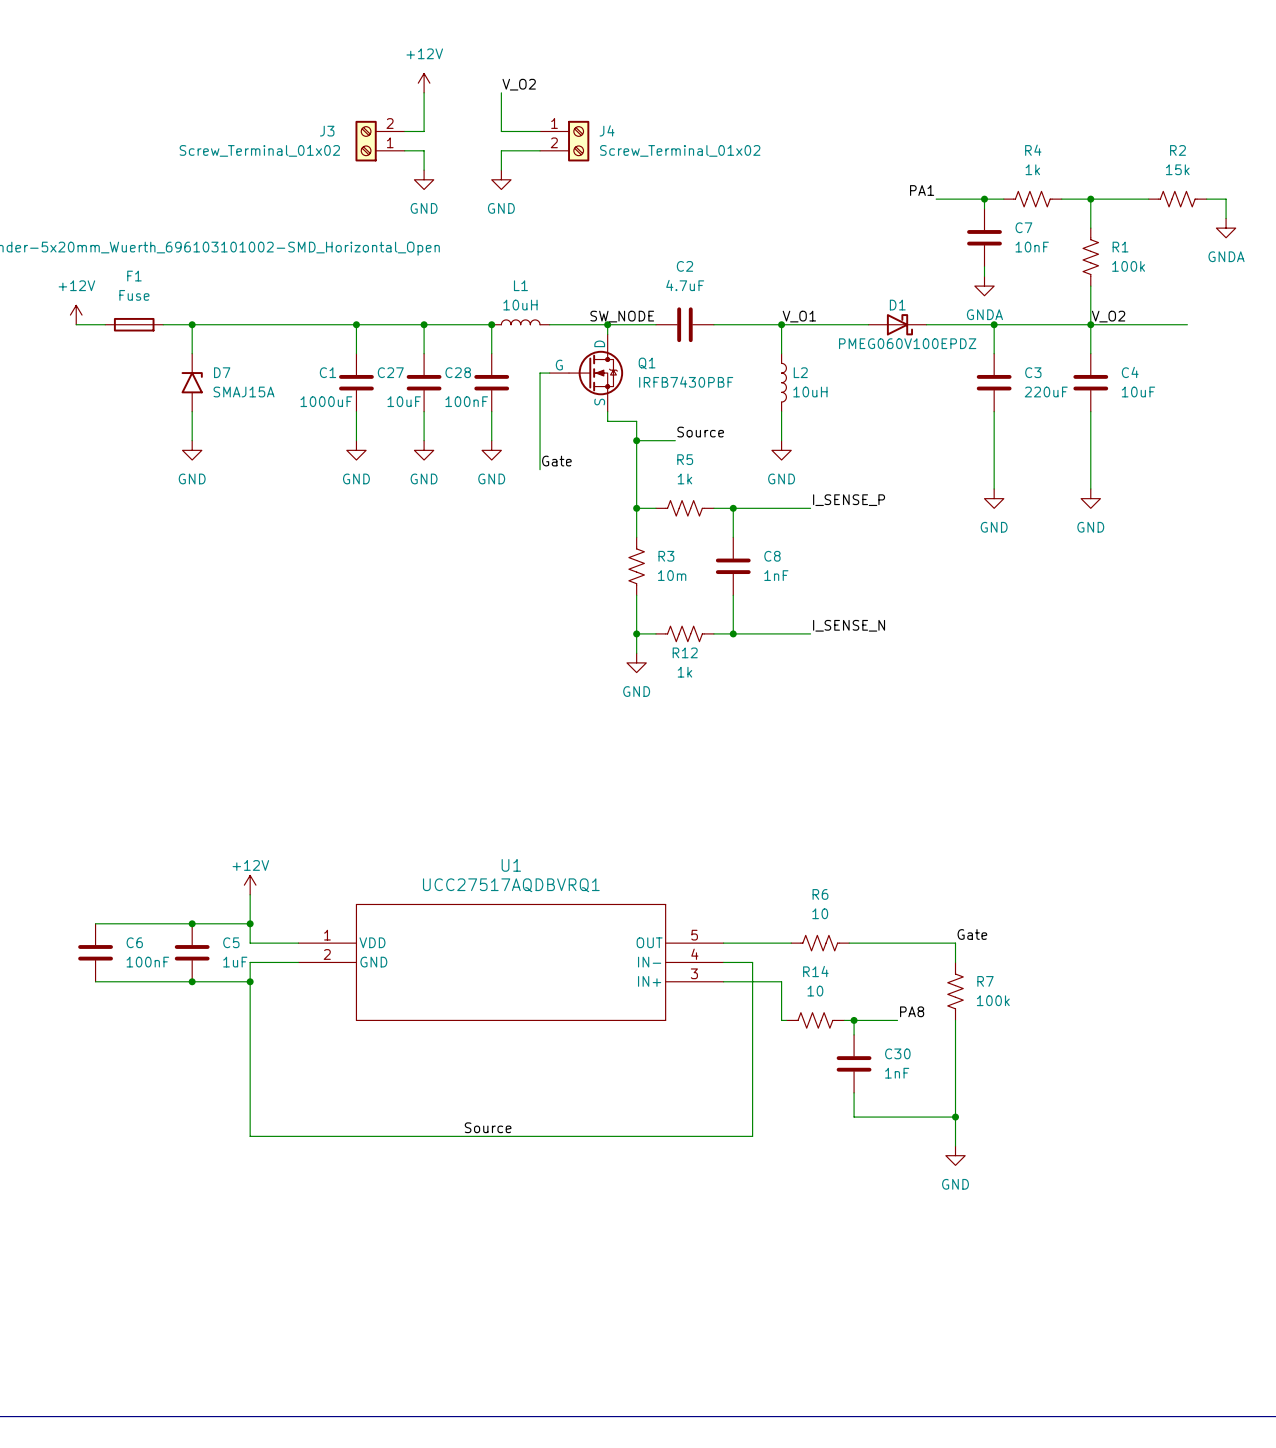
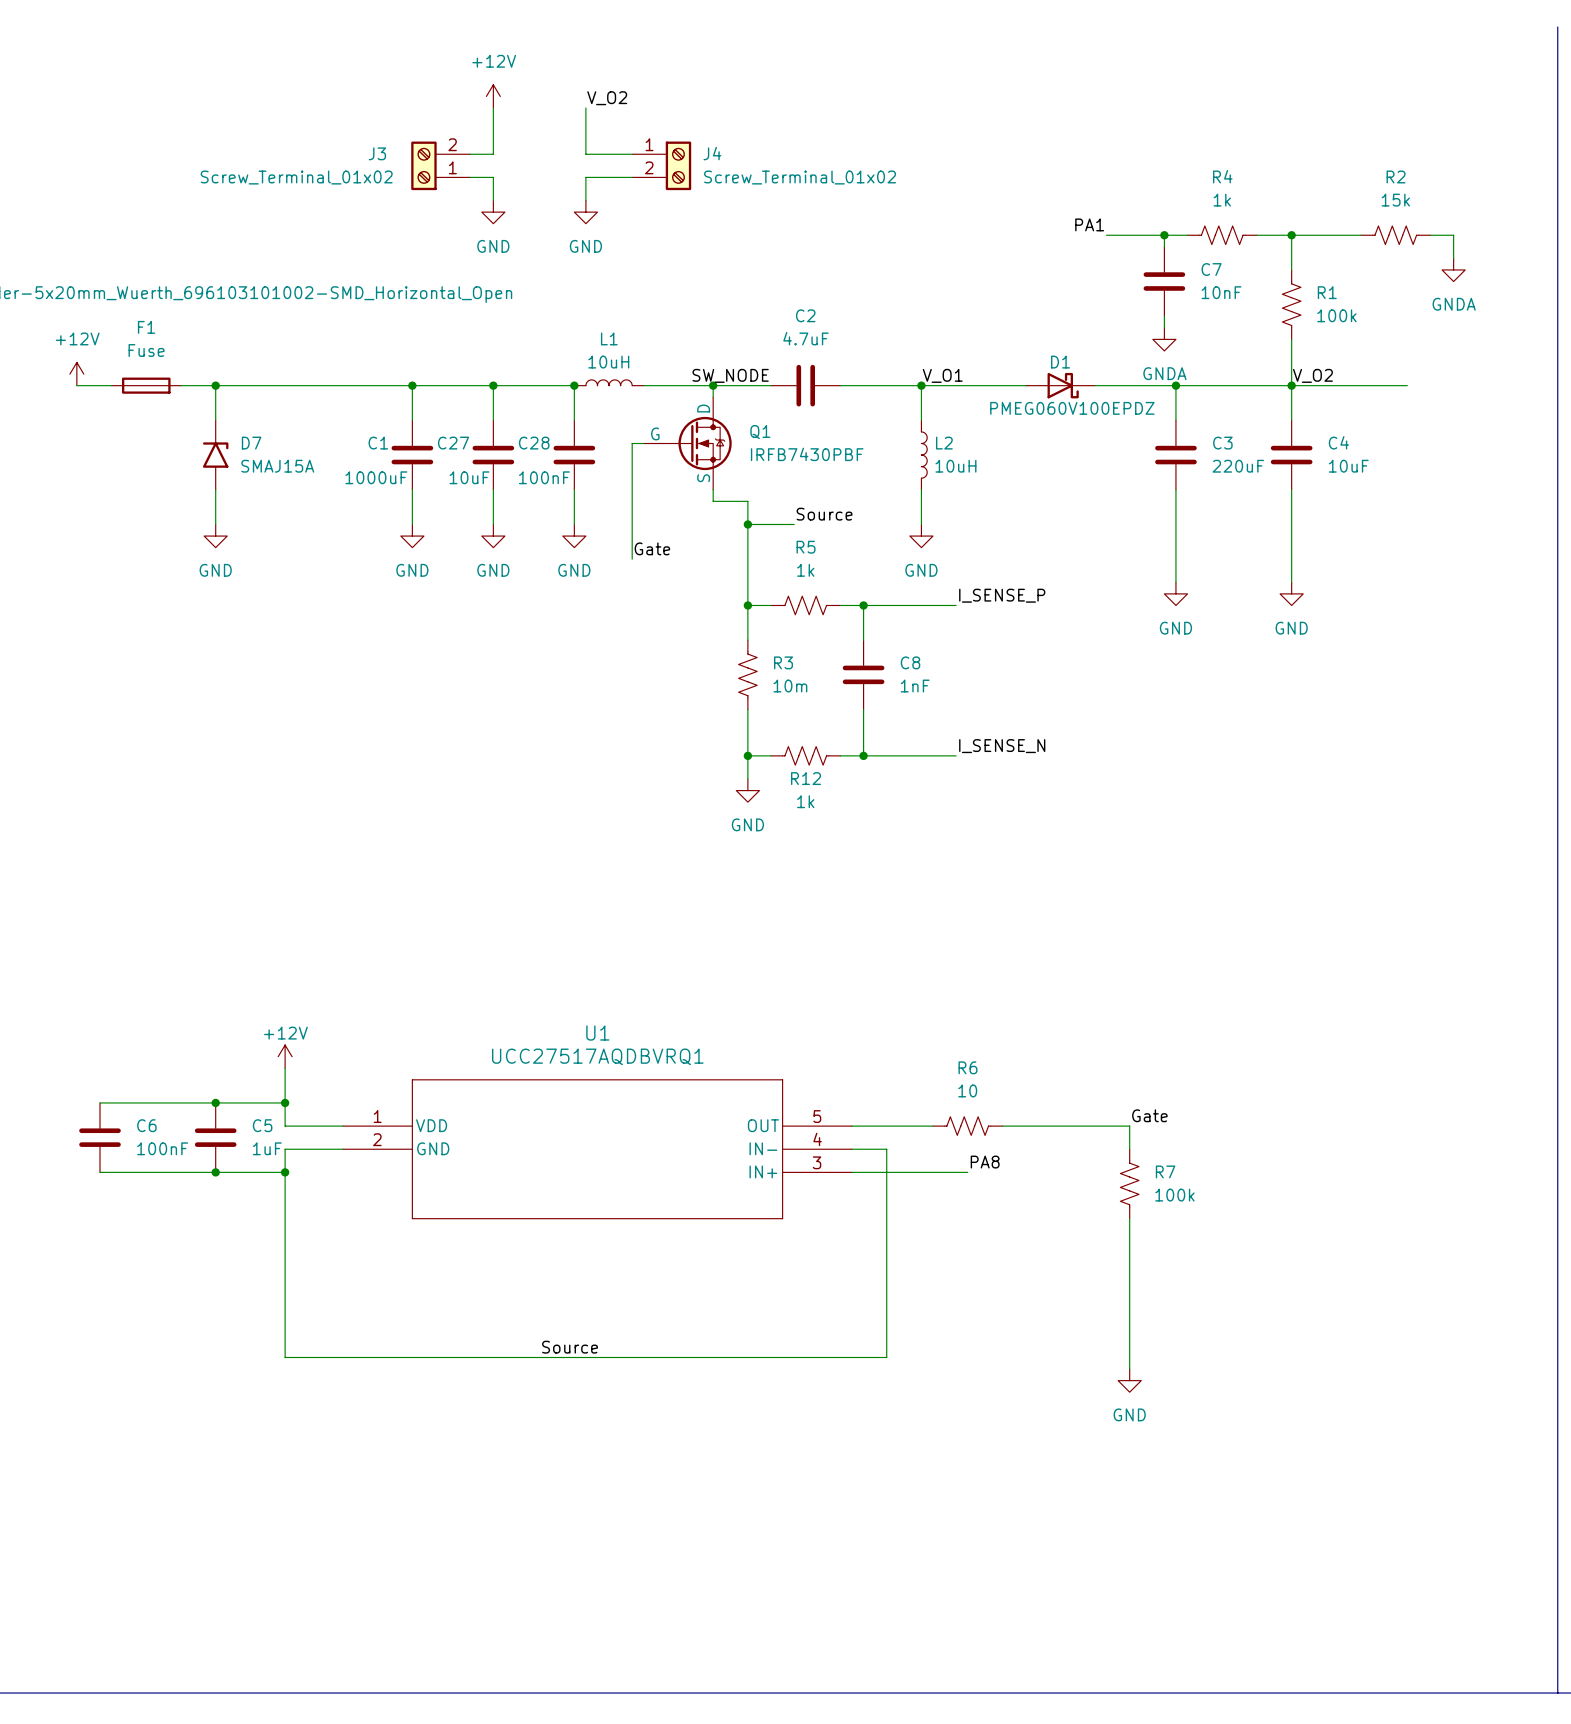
wire: (781, 981) (781, 1020) (786, 1020) -> (921, 1172) (967, 1172)
label position: PA8 (912, 1011) -> PA8 (985, 1162)
R14: 10 (815, 1020) -> none
wire: (844, 1020) (897, 1020) -> none
wire: (854, 1020) (854, 1034) -> none
junction: (854, 1020) -> none
C30: 1nF (854, 1063) -> none
wire: (854, 1092) (854, 1117) (955, 1117) -> none
junction: (955, 1117) -> none

